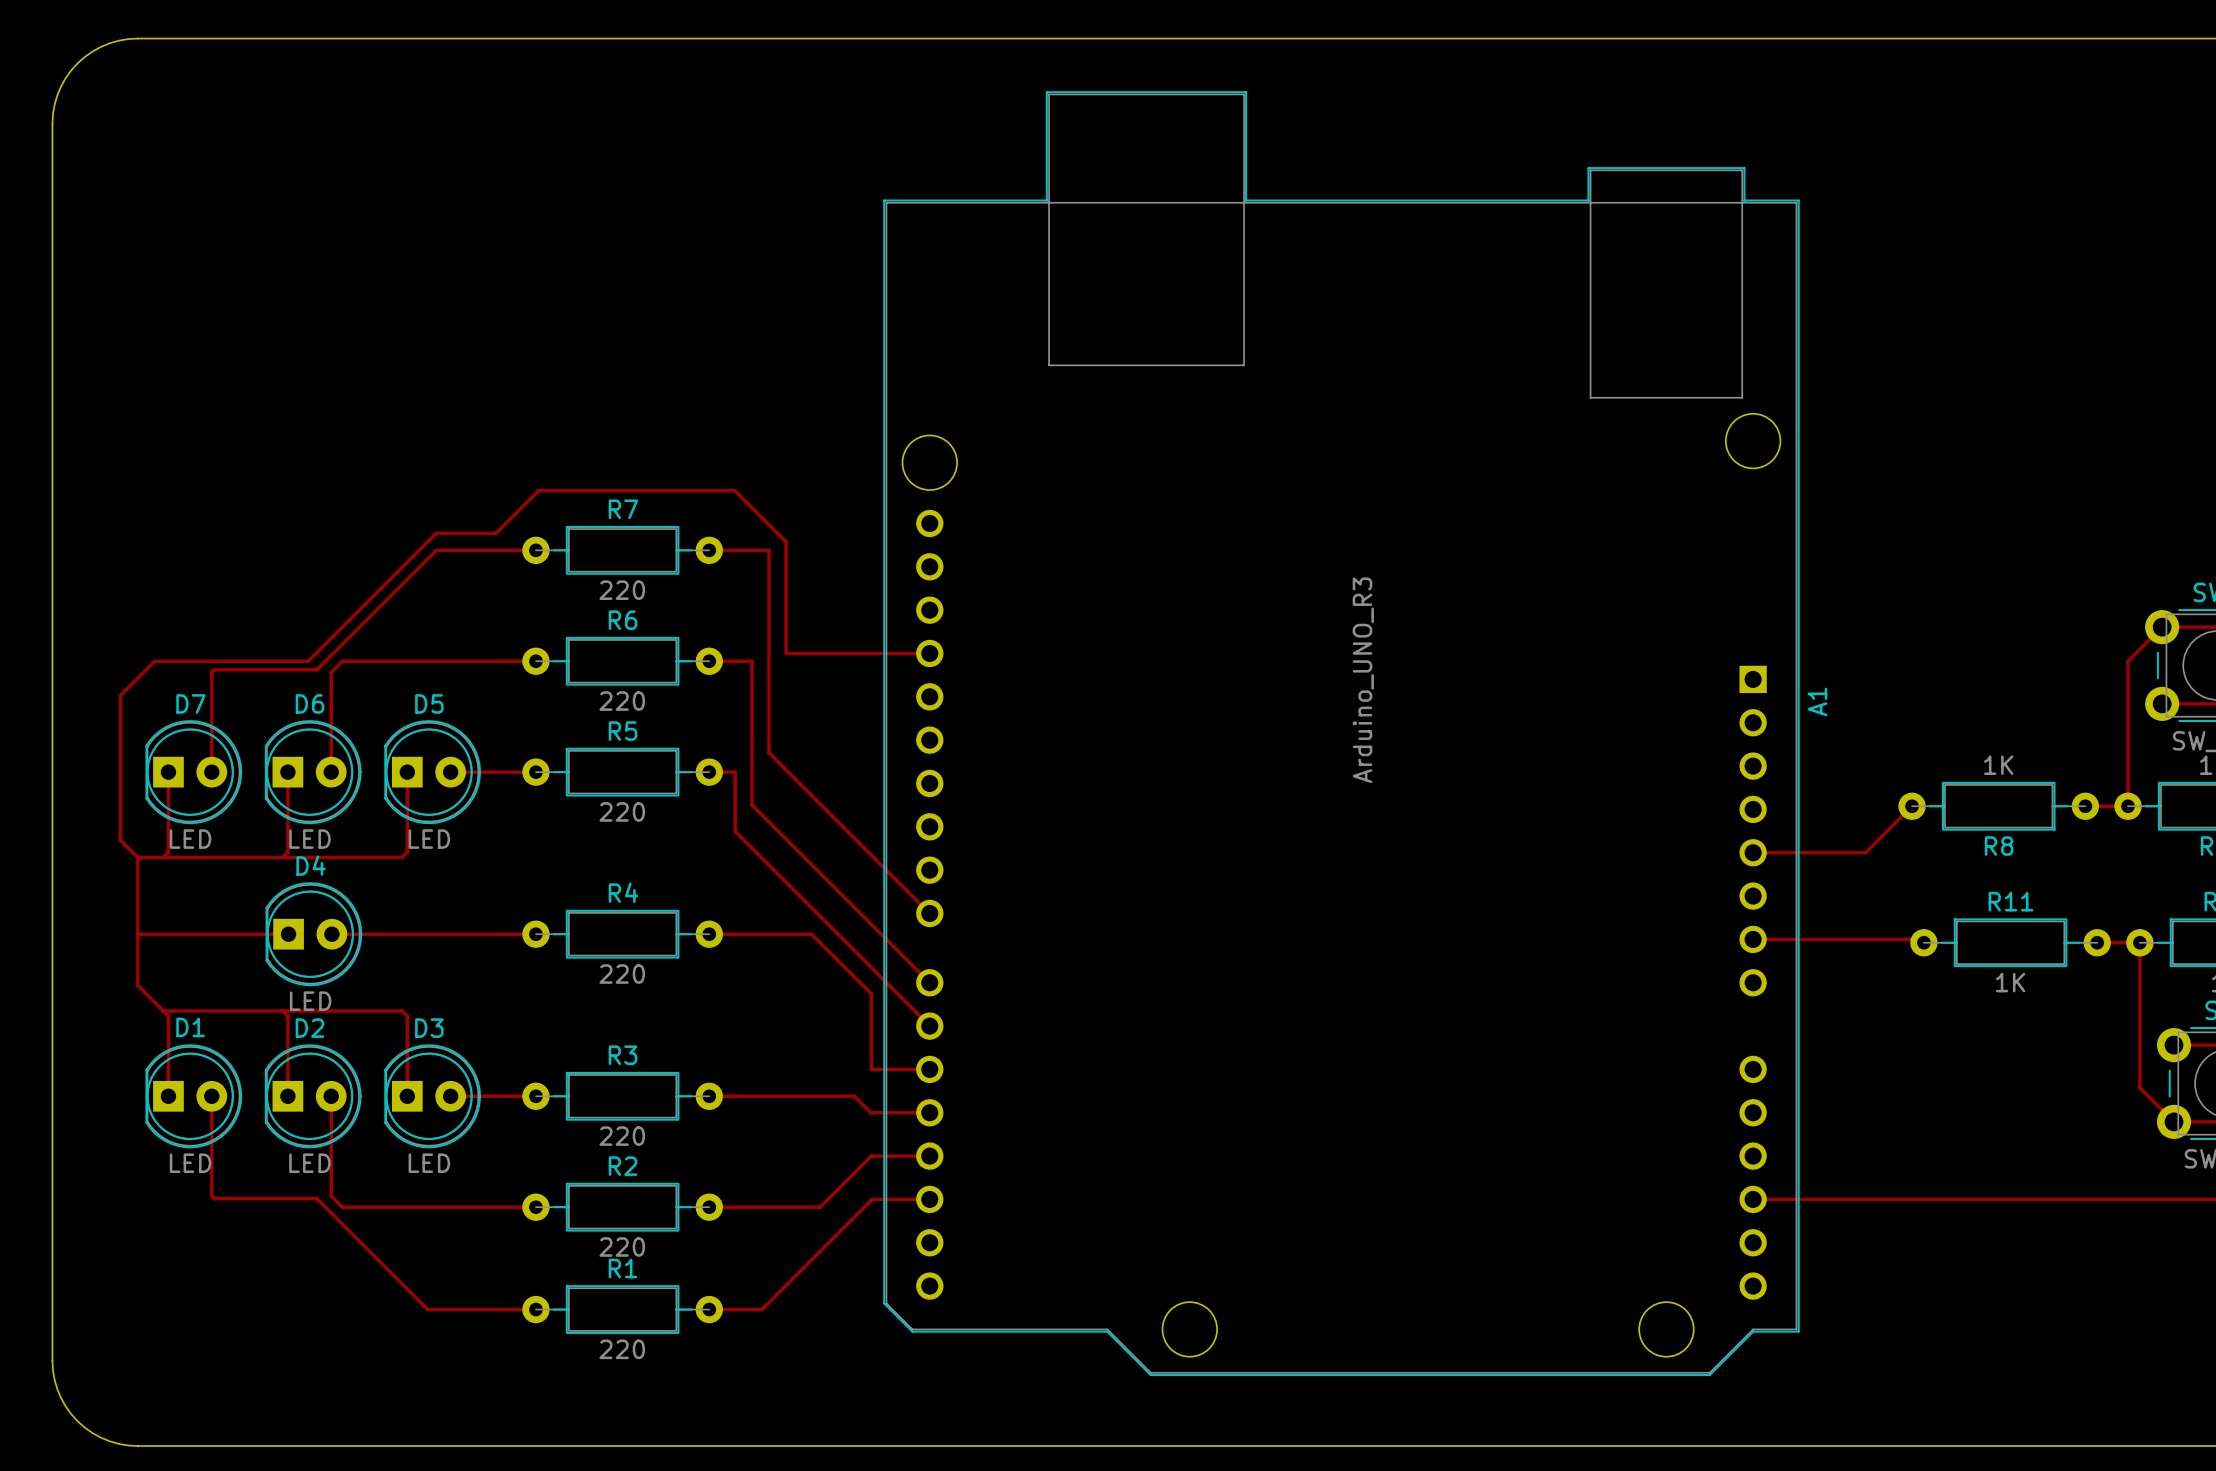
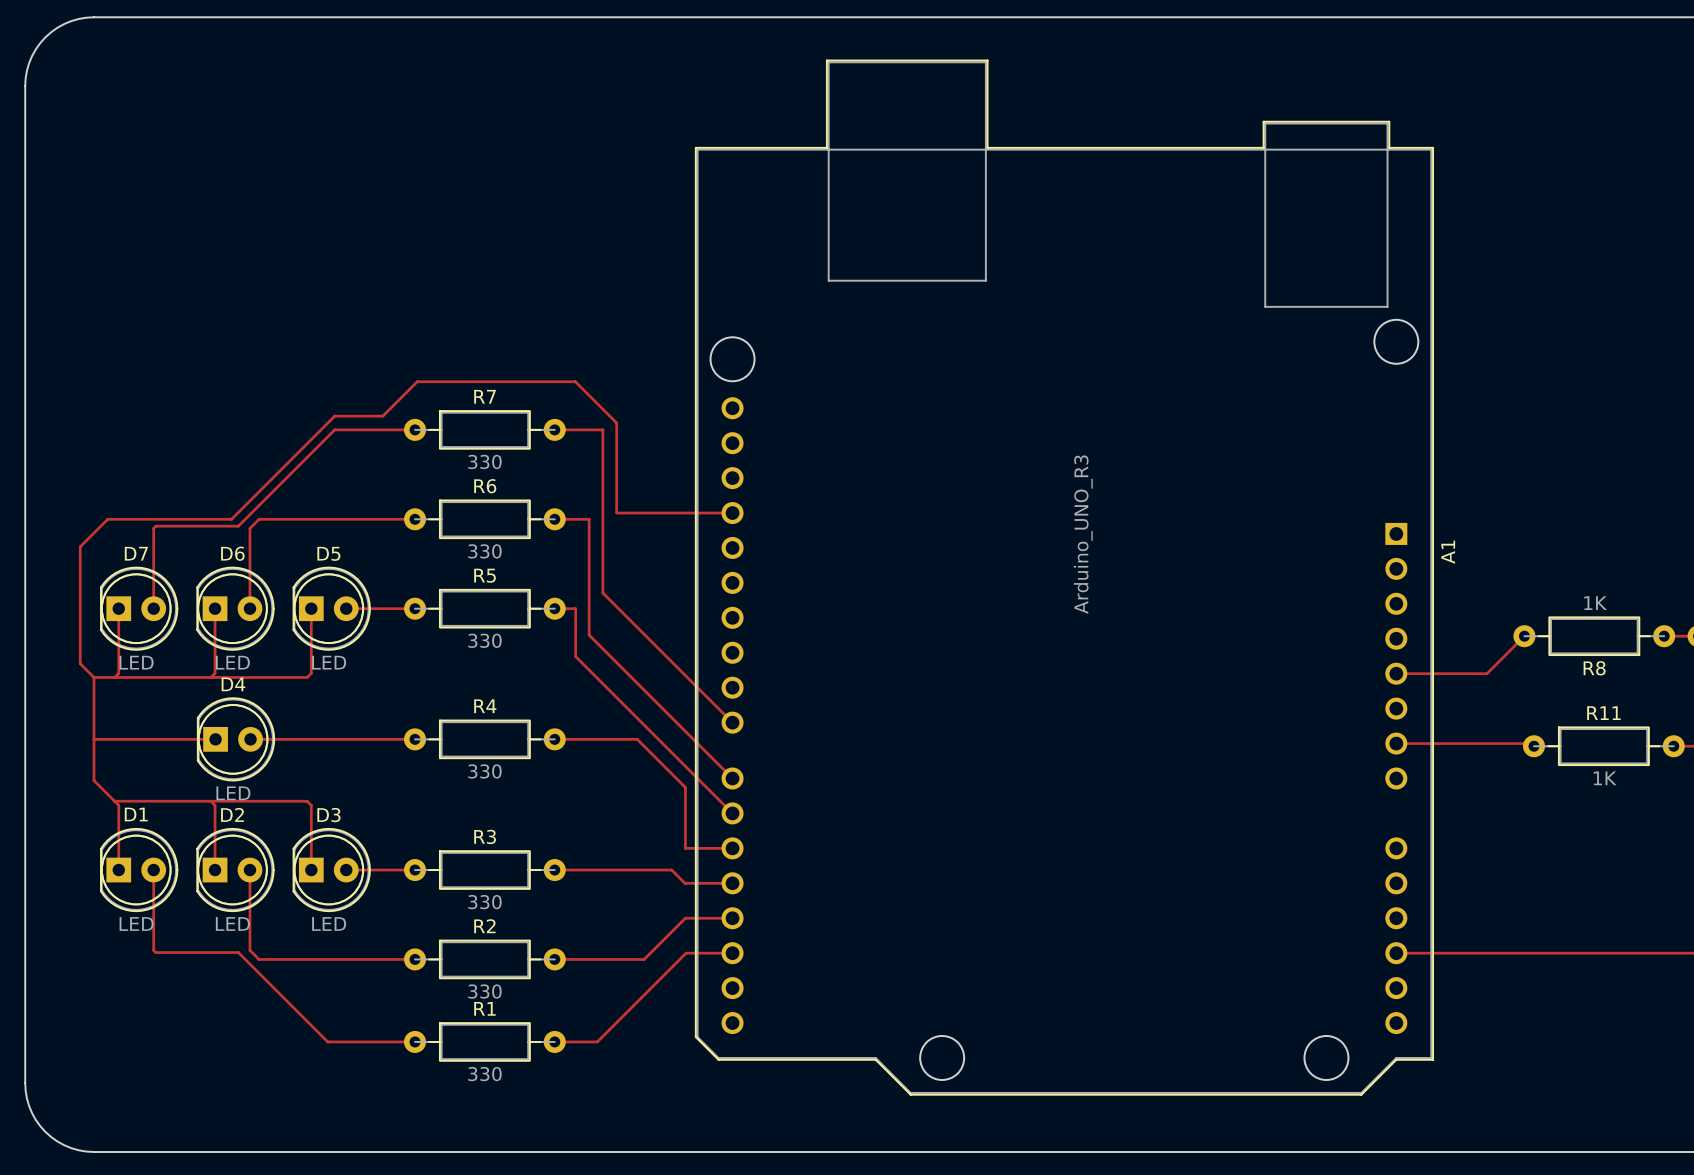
R7 value: 220 (622, 590) -> 330 (484, 461)
R6 value: 220 (622, 701) -> 330 (484, 551)
R5 value: 220 (622, 811) -> 330 (484, 640)
R4 value: 220 (622, 974) -> 330 (484, 771)
R3 value: 220 (622, 1136) -> 330 (484, 902)
R2 value: 220 (622, 1246) -> 330 (484, 991)
R1 value: 220 (622, 1349) -> 330 (484, 1074)

